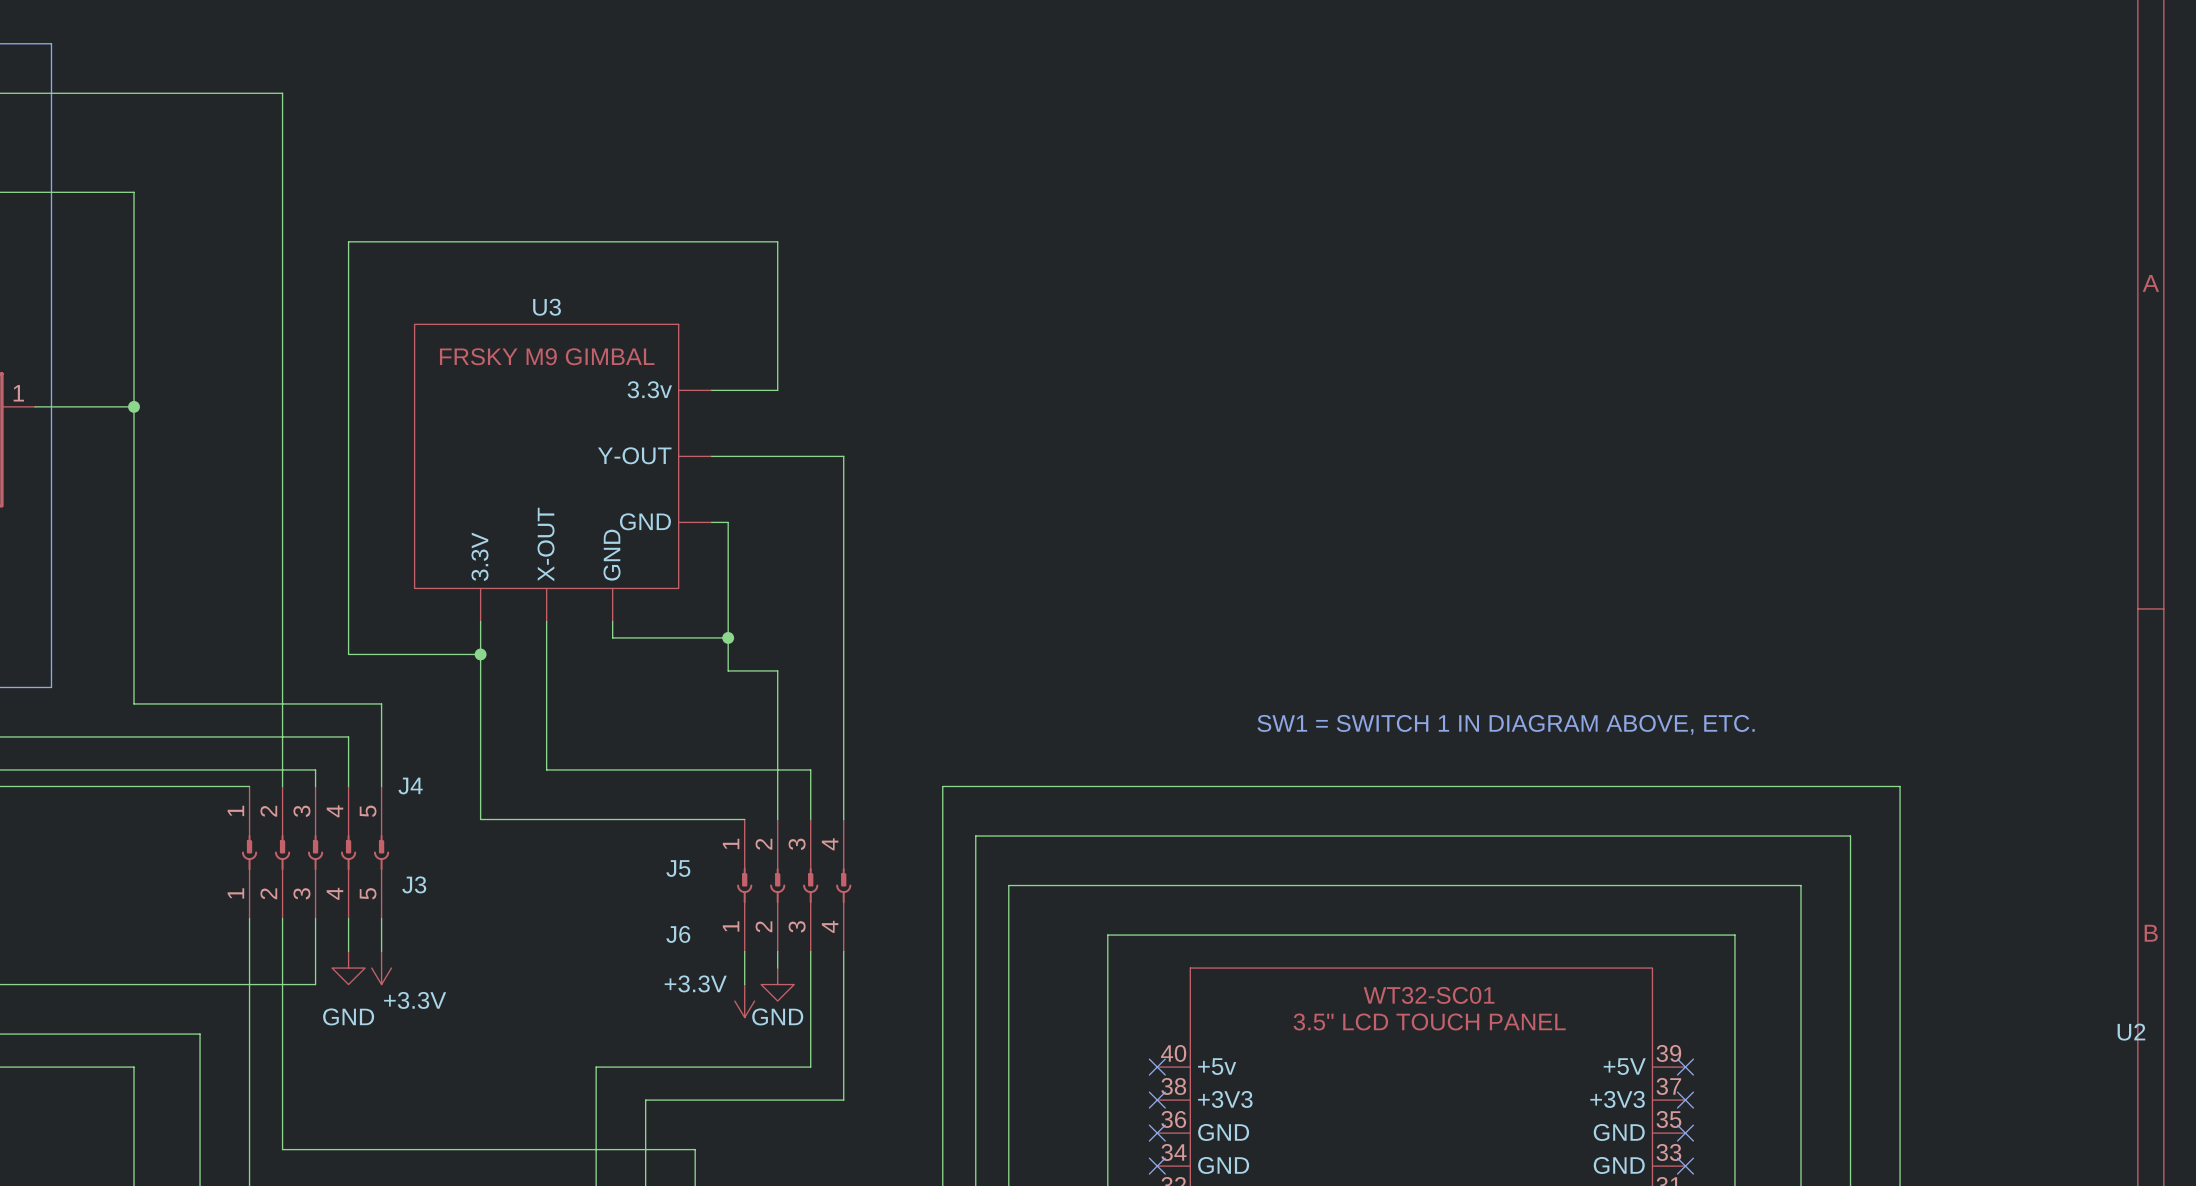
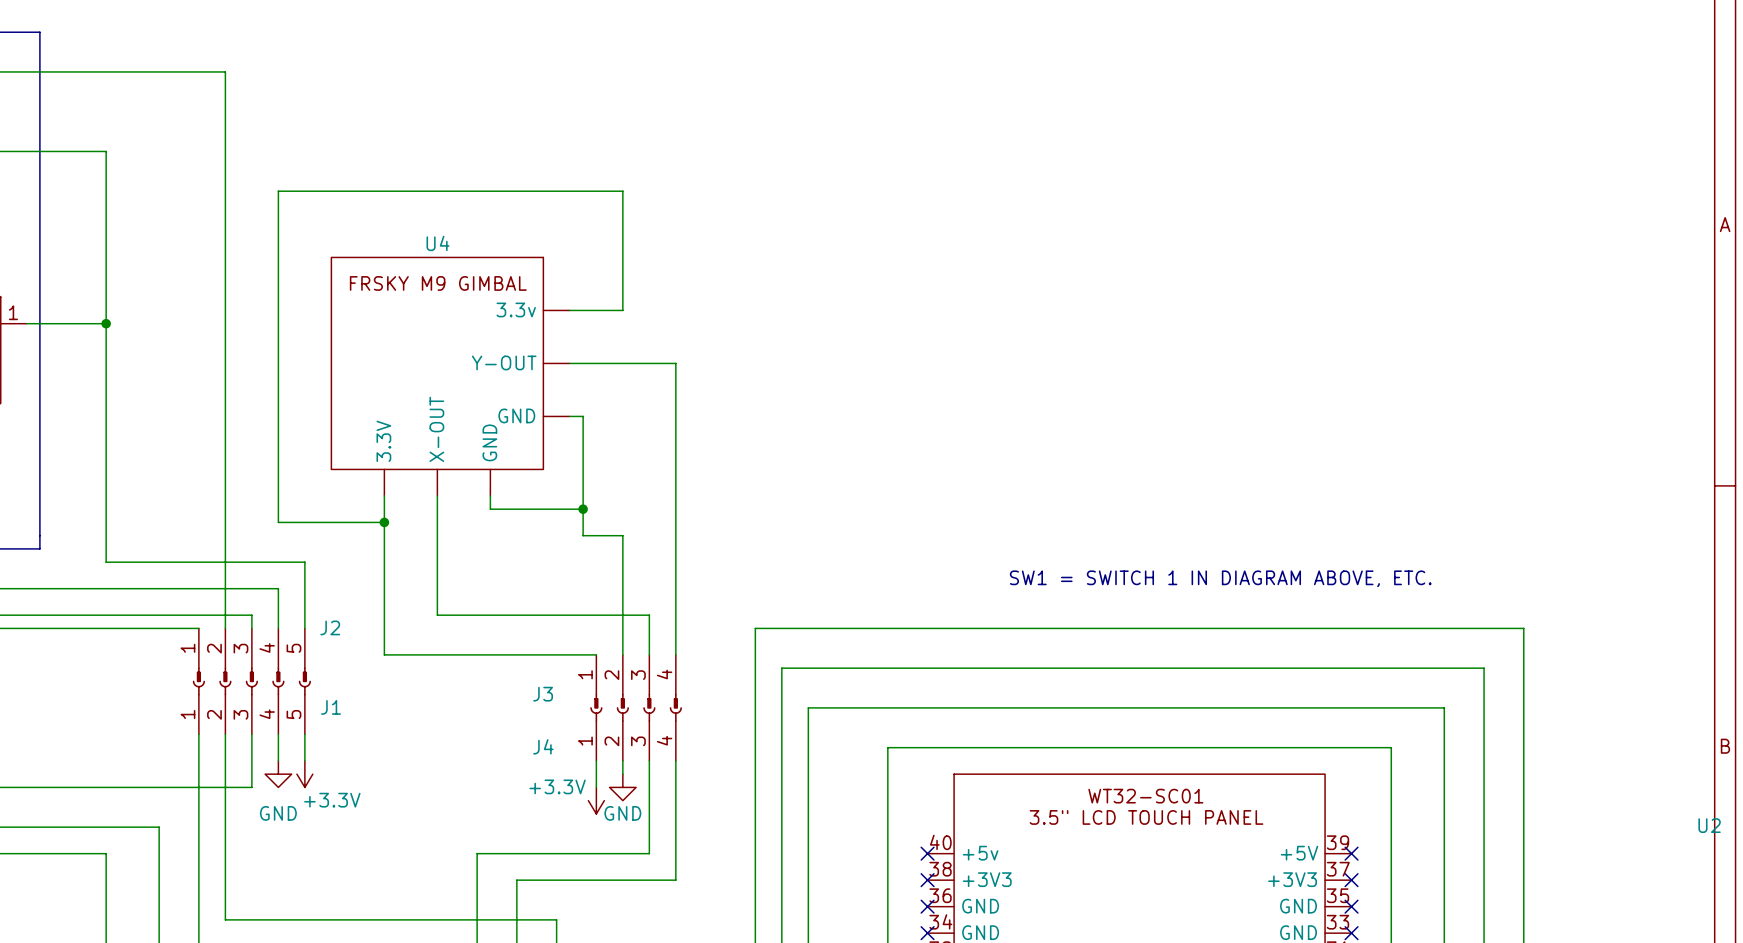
U3 name: U3 (547, 307) -> U4 (438, 243)
J4 name: J4 (410, 785) -> J2 (330, 627)
J5 name: J5 (678, 868) -> J3 (543, 694)
J3 name: J3 (414, 884) -> J1 (331, 707)
J6 name: J6 (678, 934) -> J4 (543, 746)

